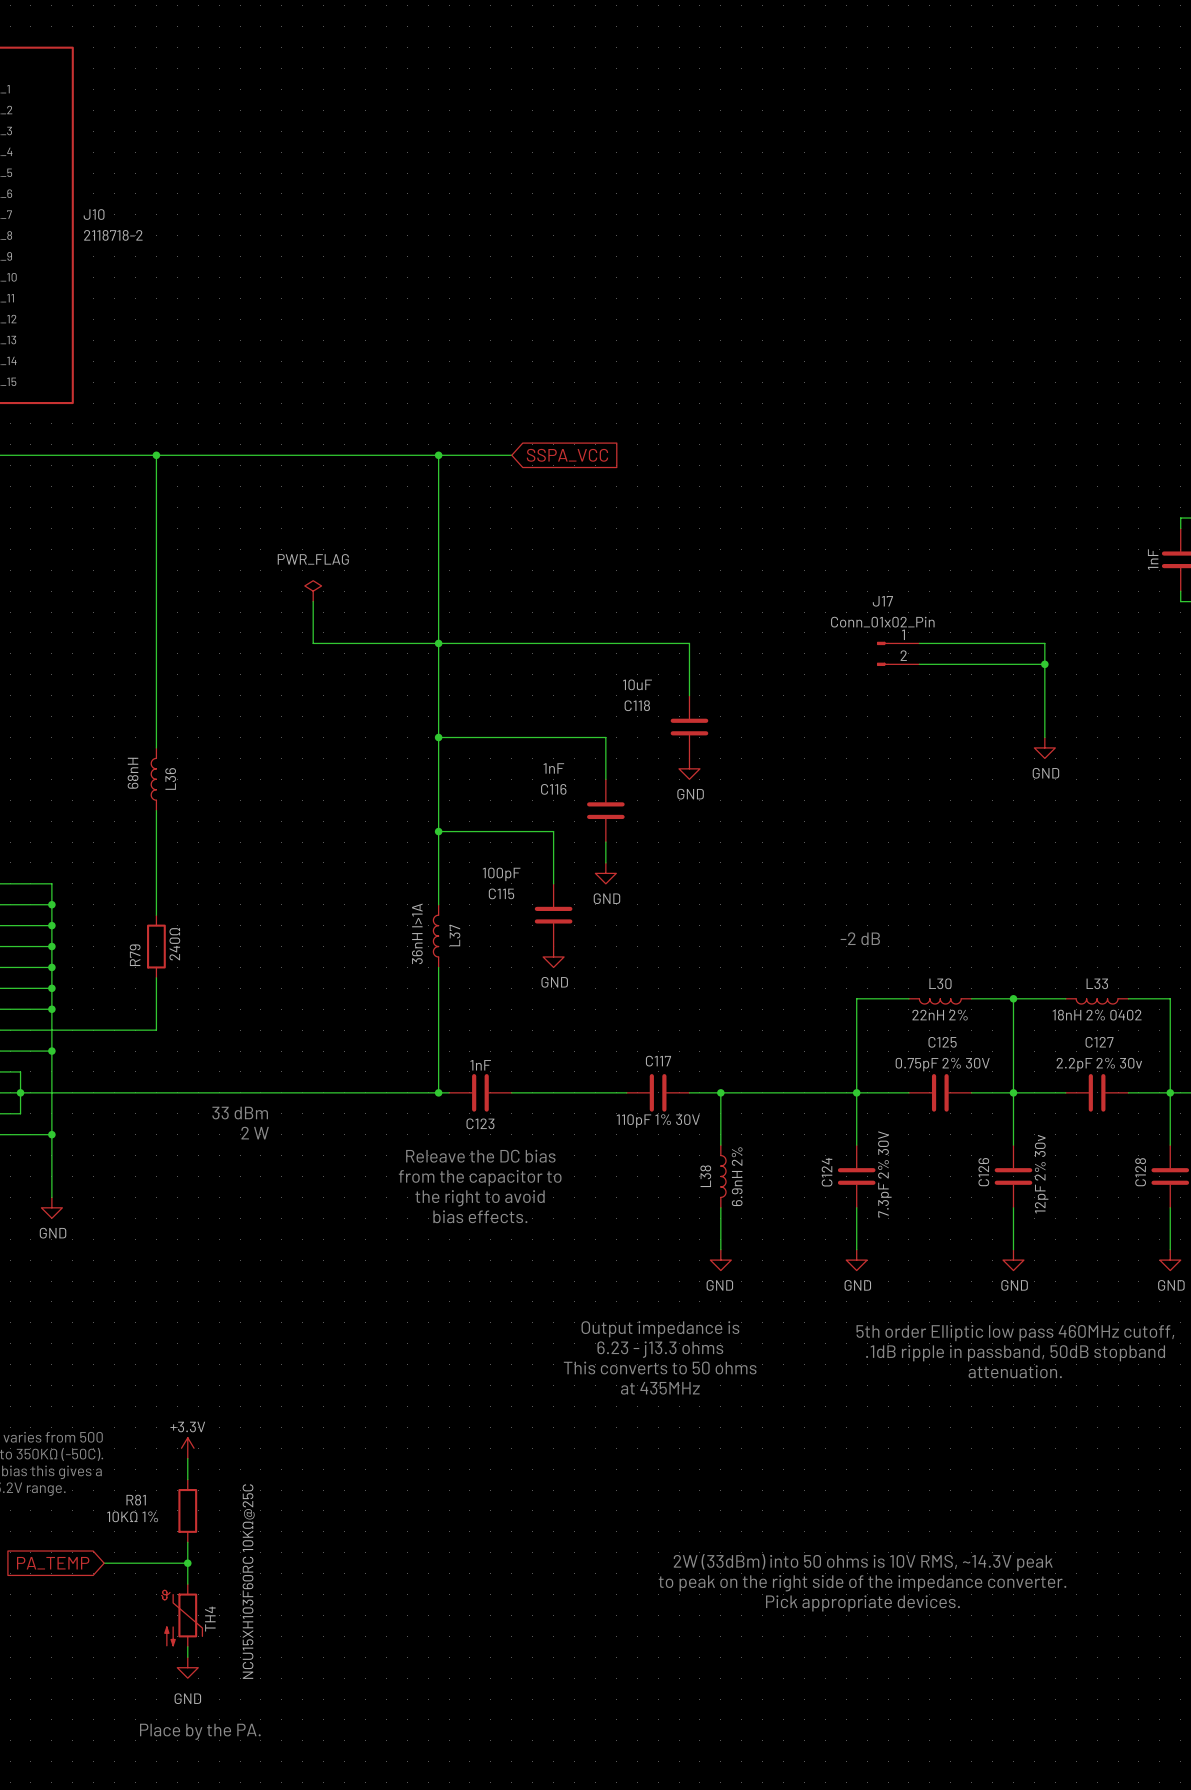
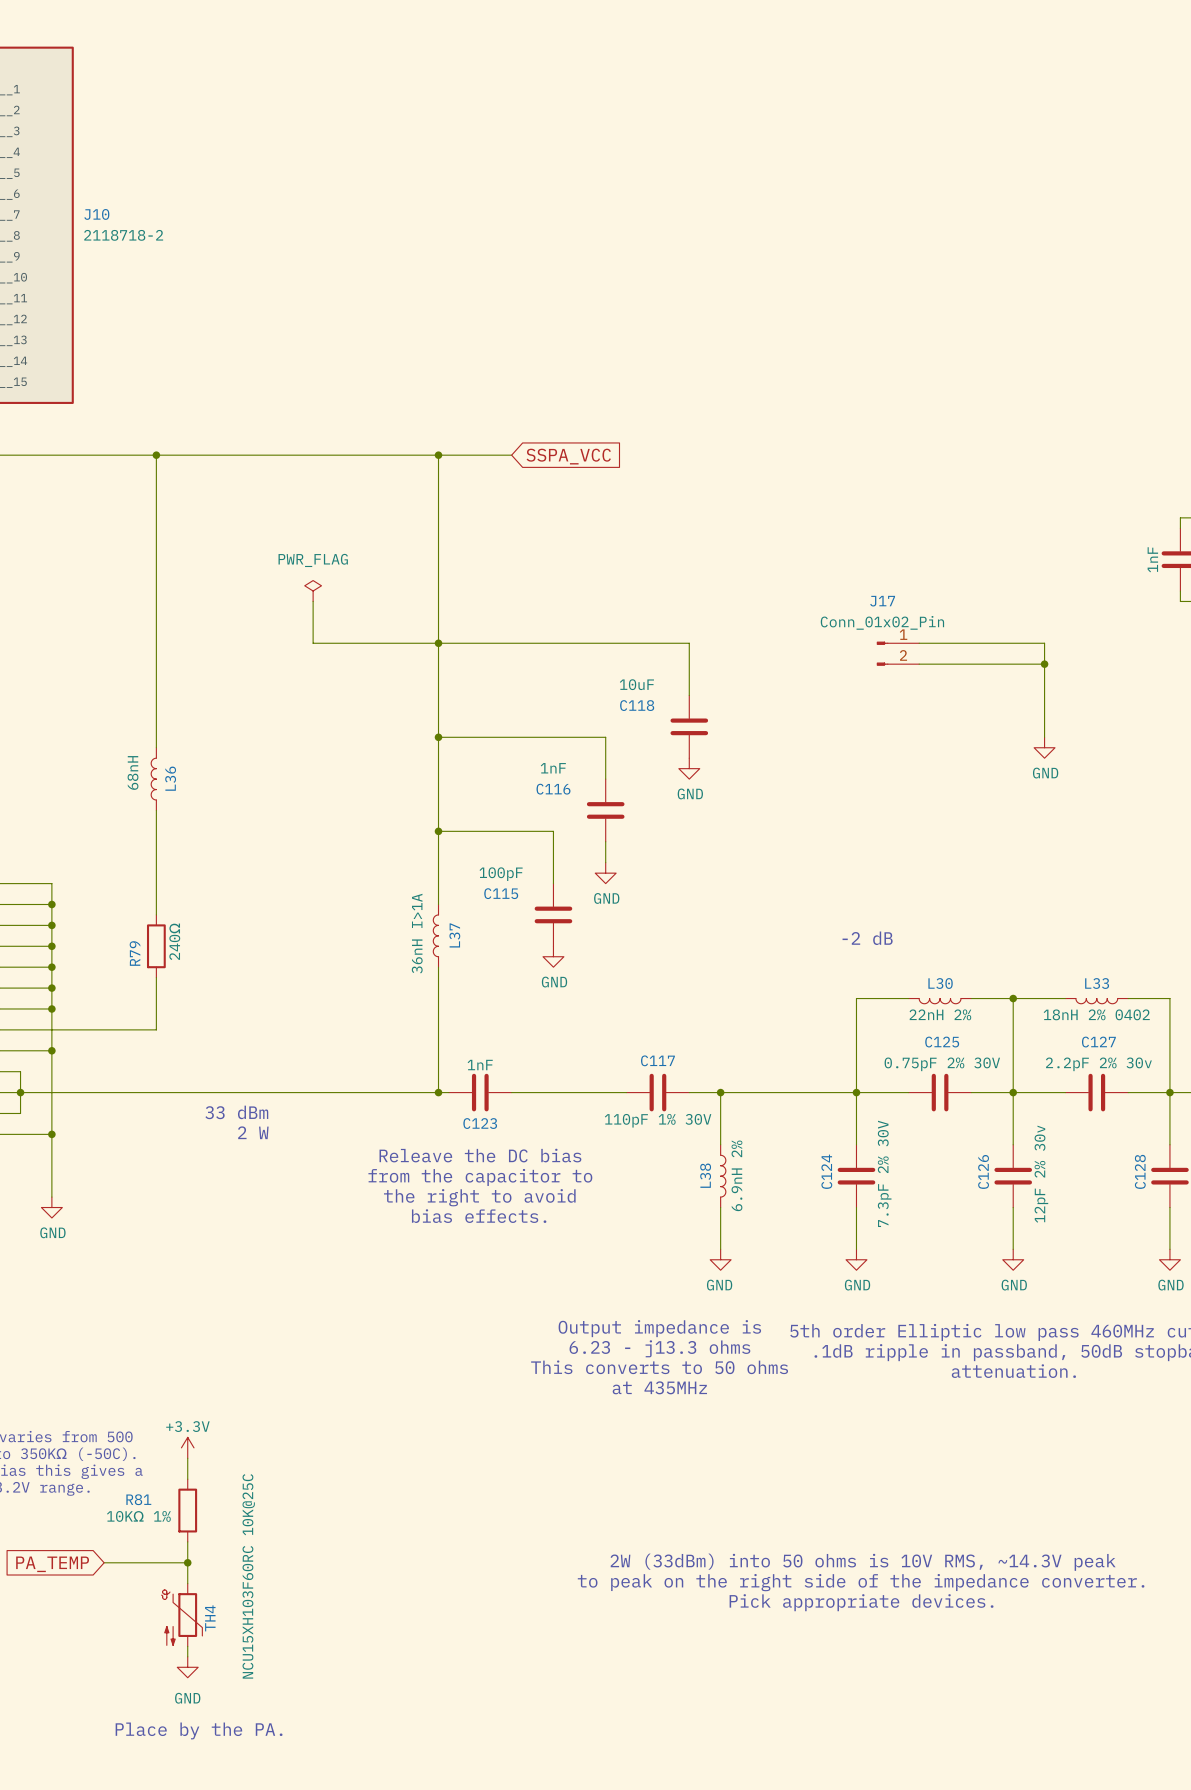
TH4 value: NCU15XH103F60RC 10KΩ@25C (248, 1581) -> NCU15XH103F60RC 10K@25C (248, 1576)

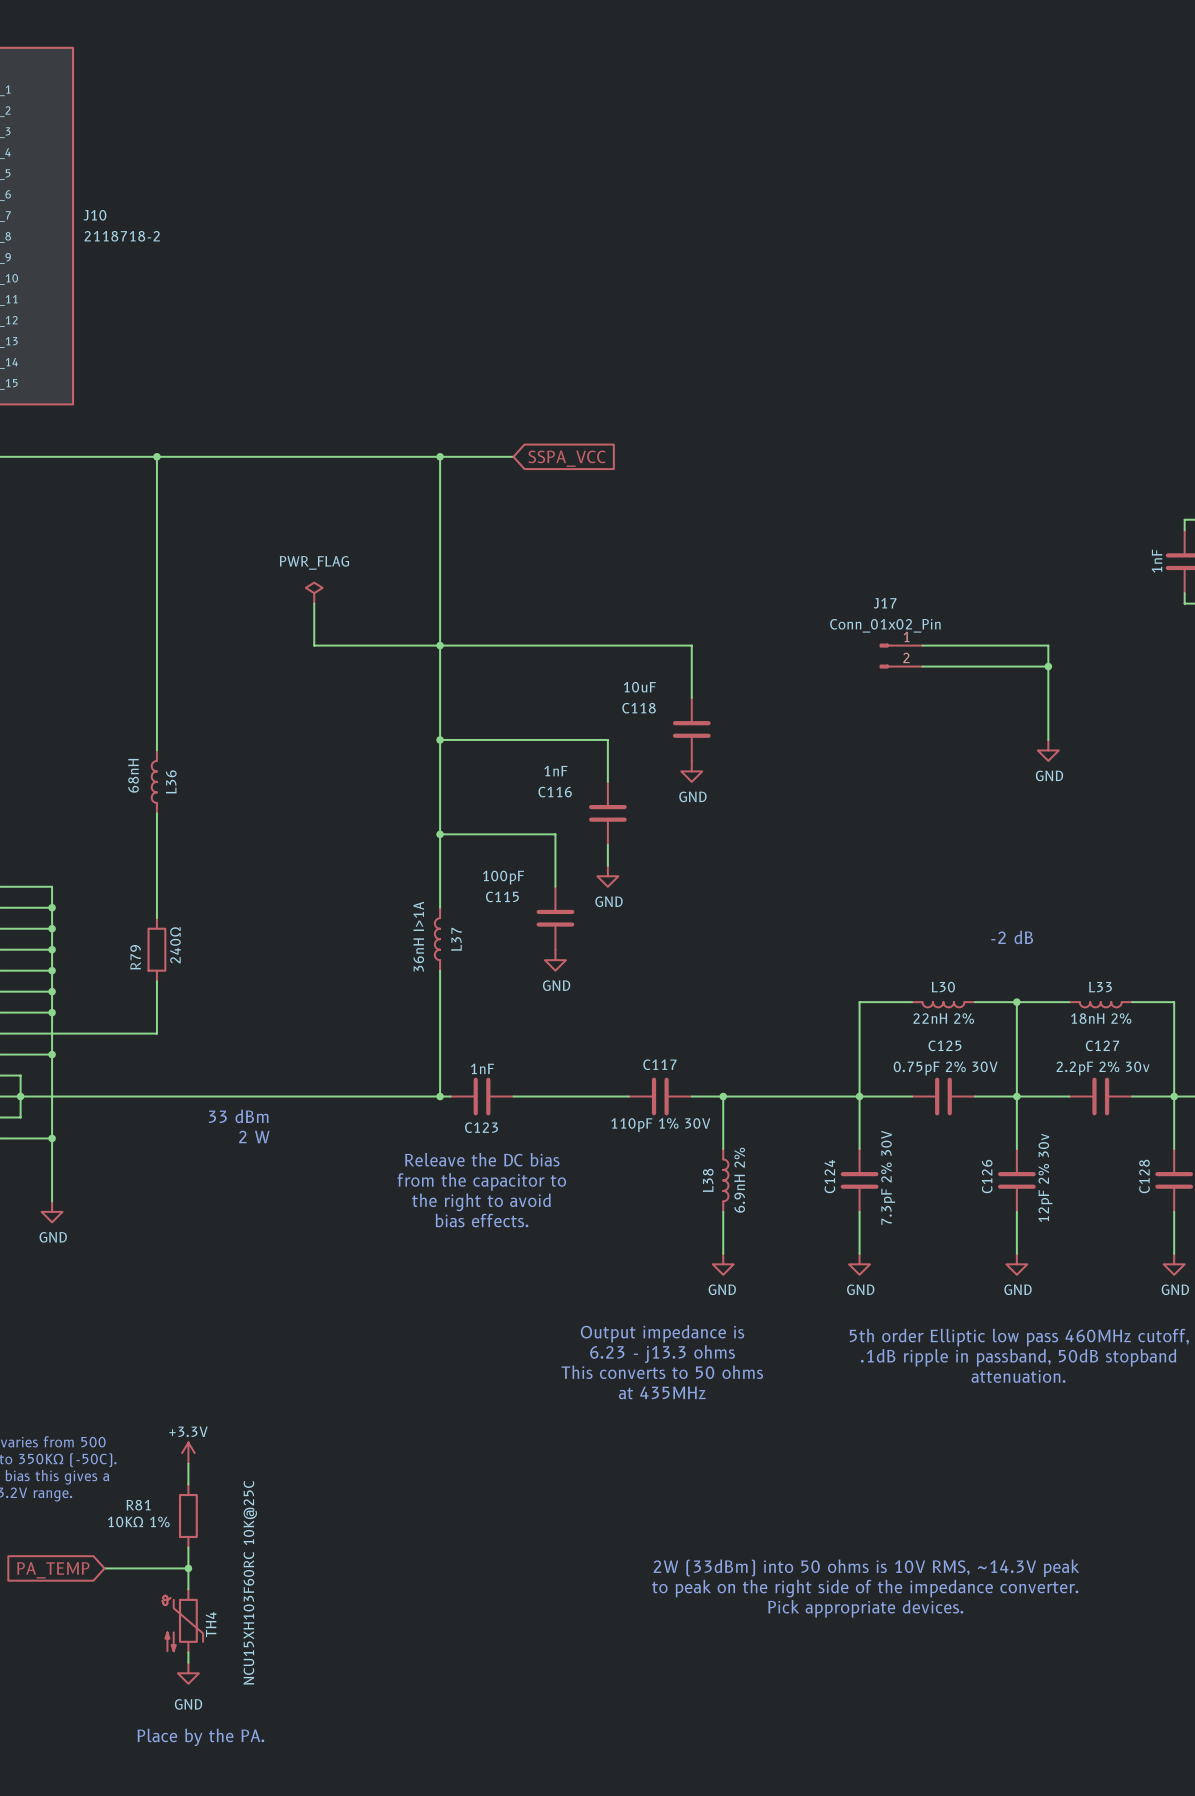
text position: -2 dB (867, 938) -> -2 dB (1012, 937)
L33 value: 18nH 2% 0402 (1096, 1014) -> 18nH 2% (1101, 1018)

